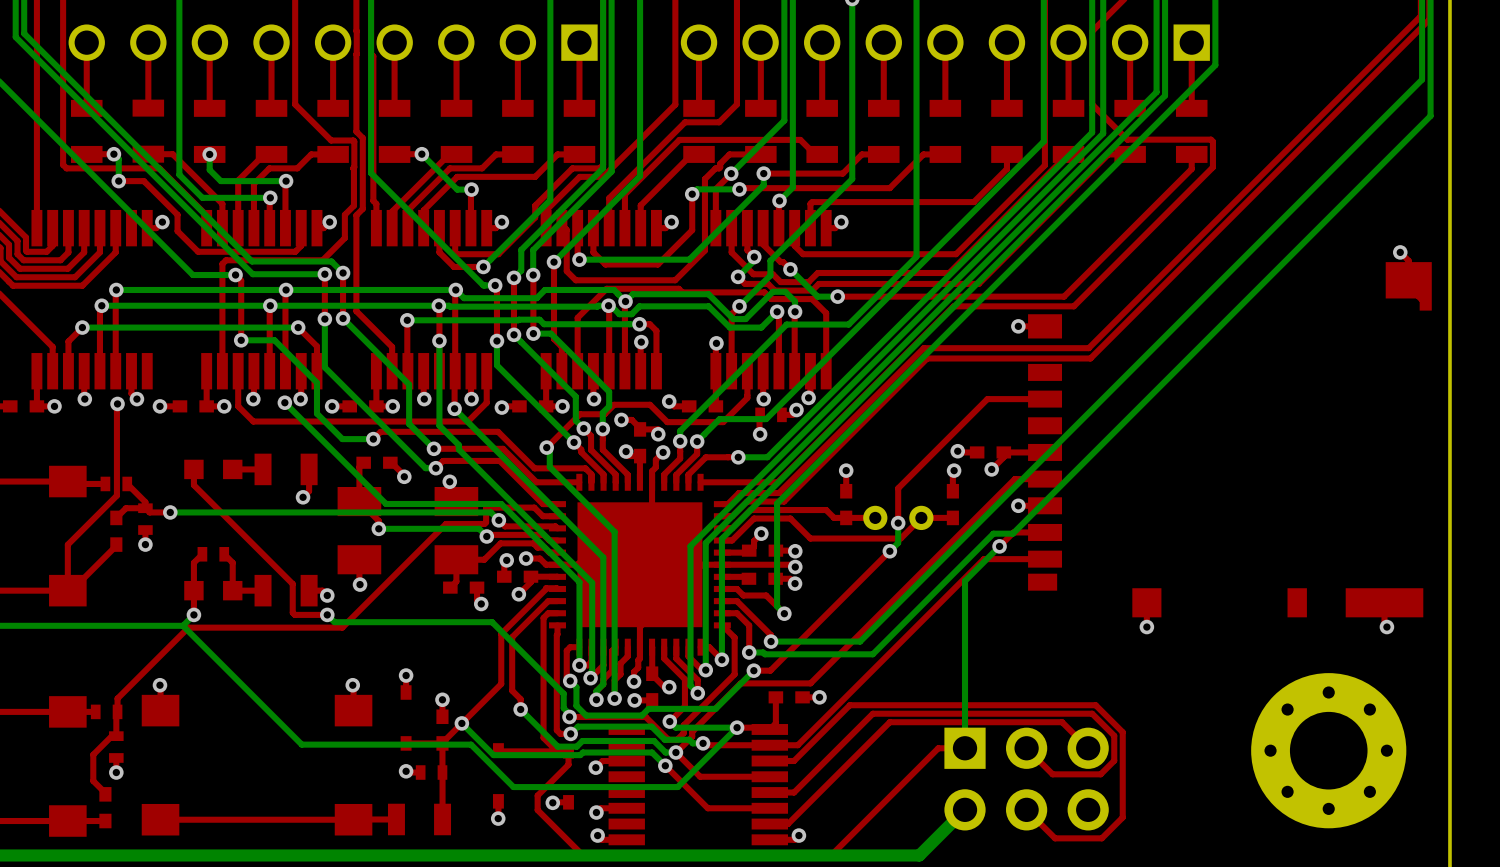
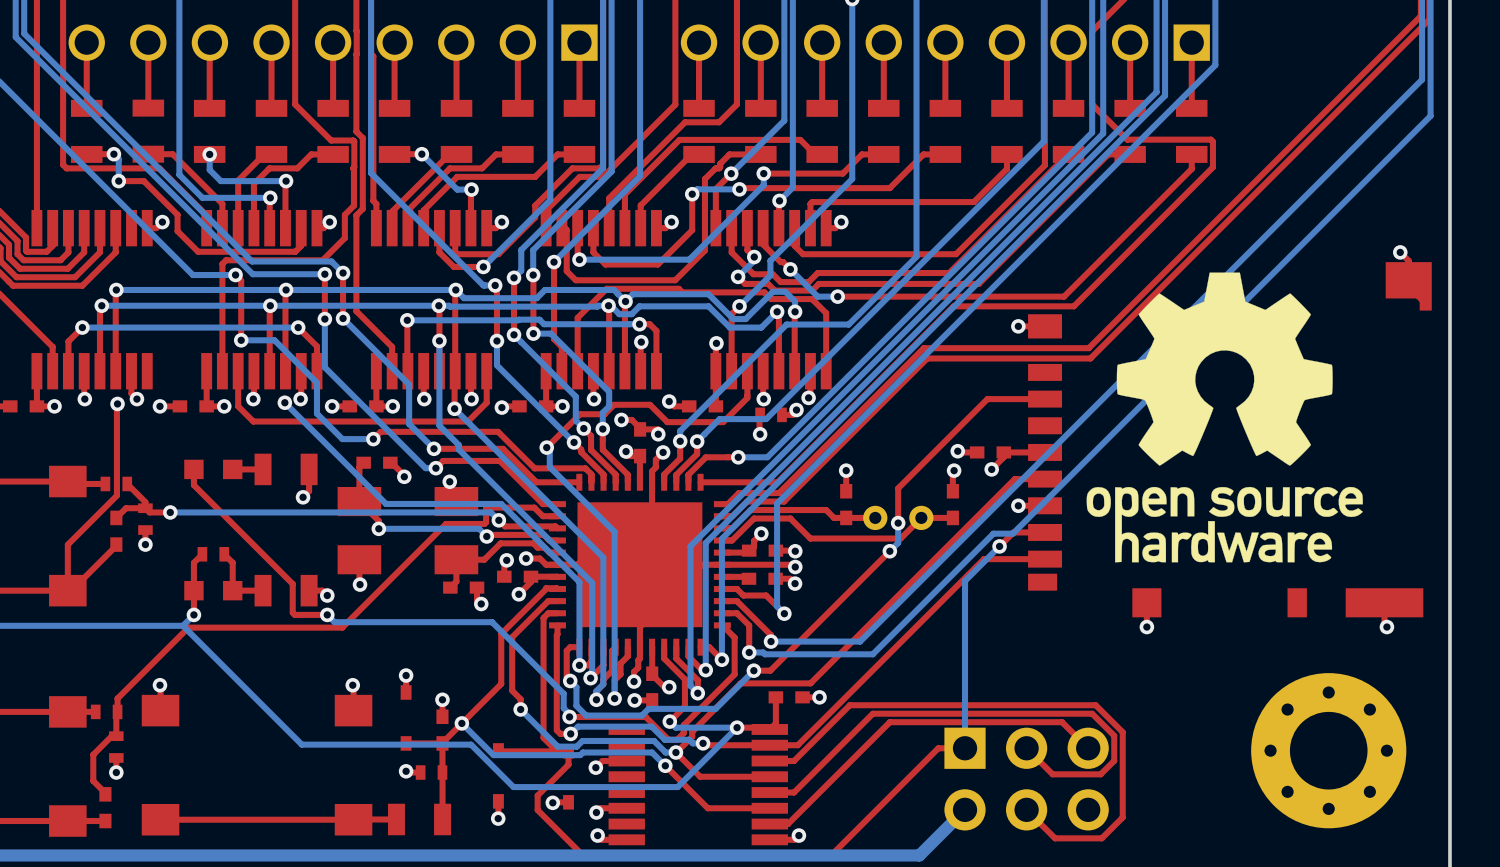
drawing: none -> [1086, 272, 1363, 563]

